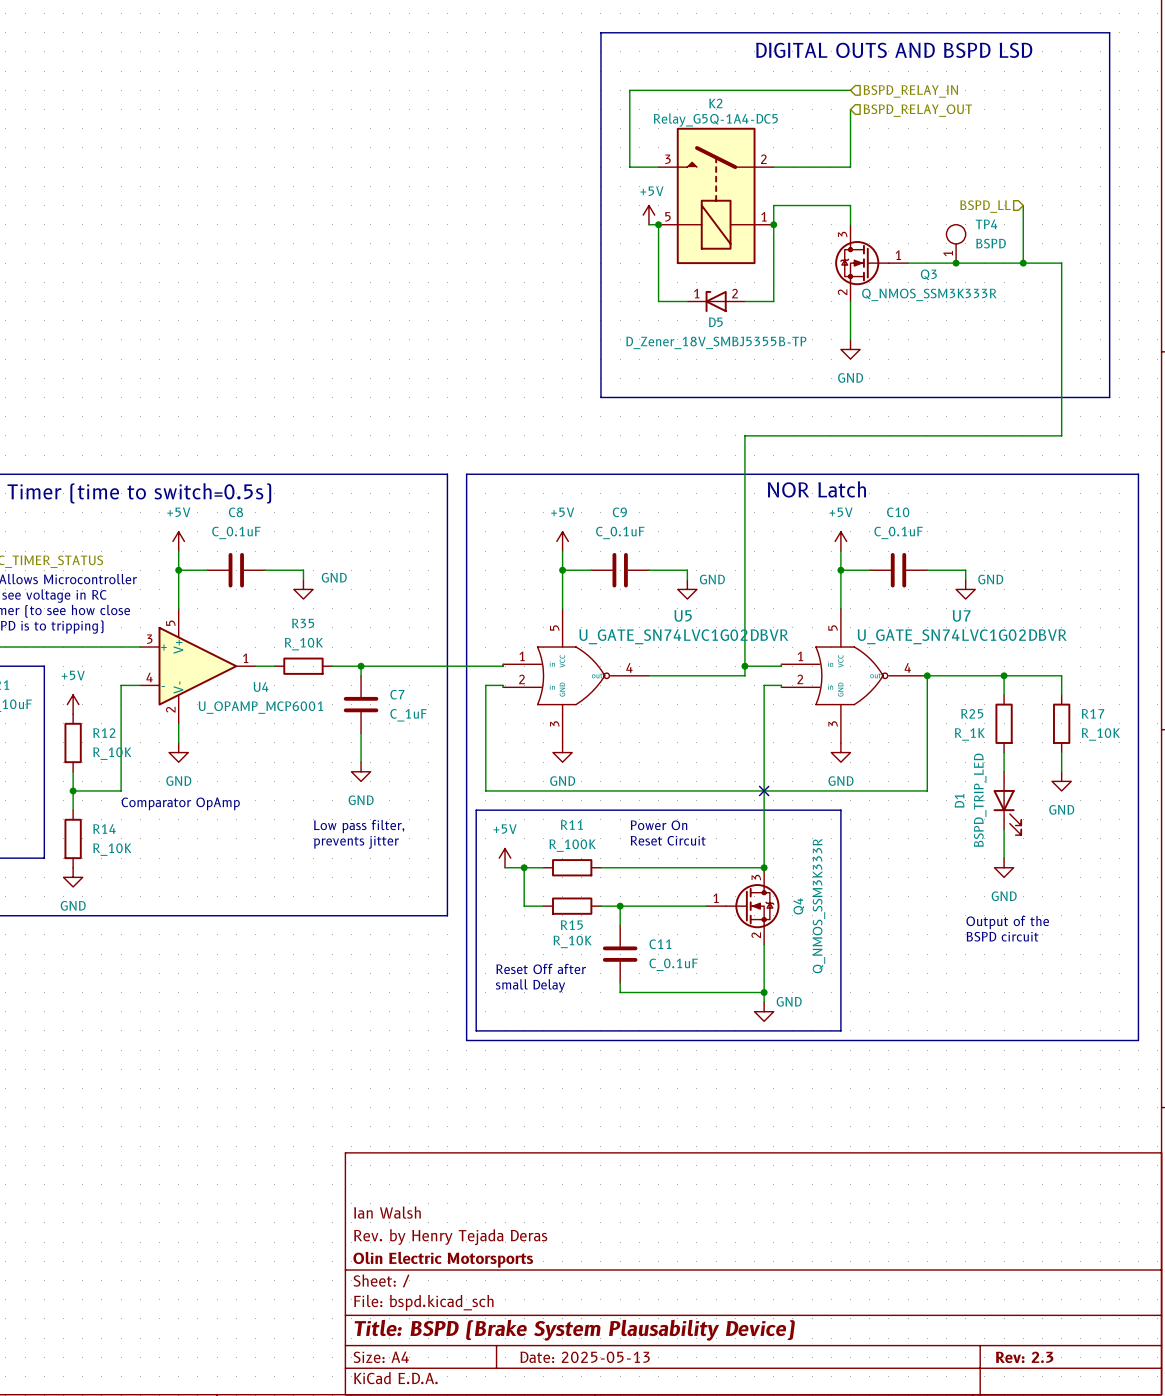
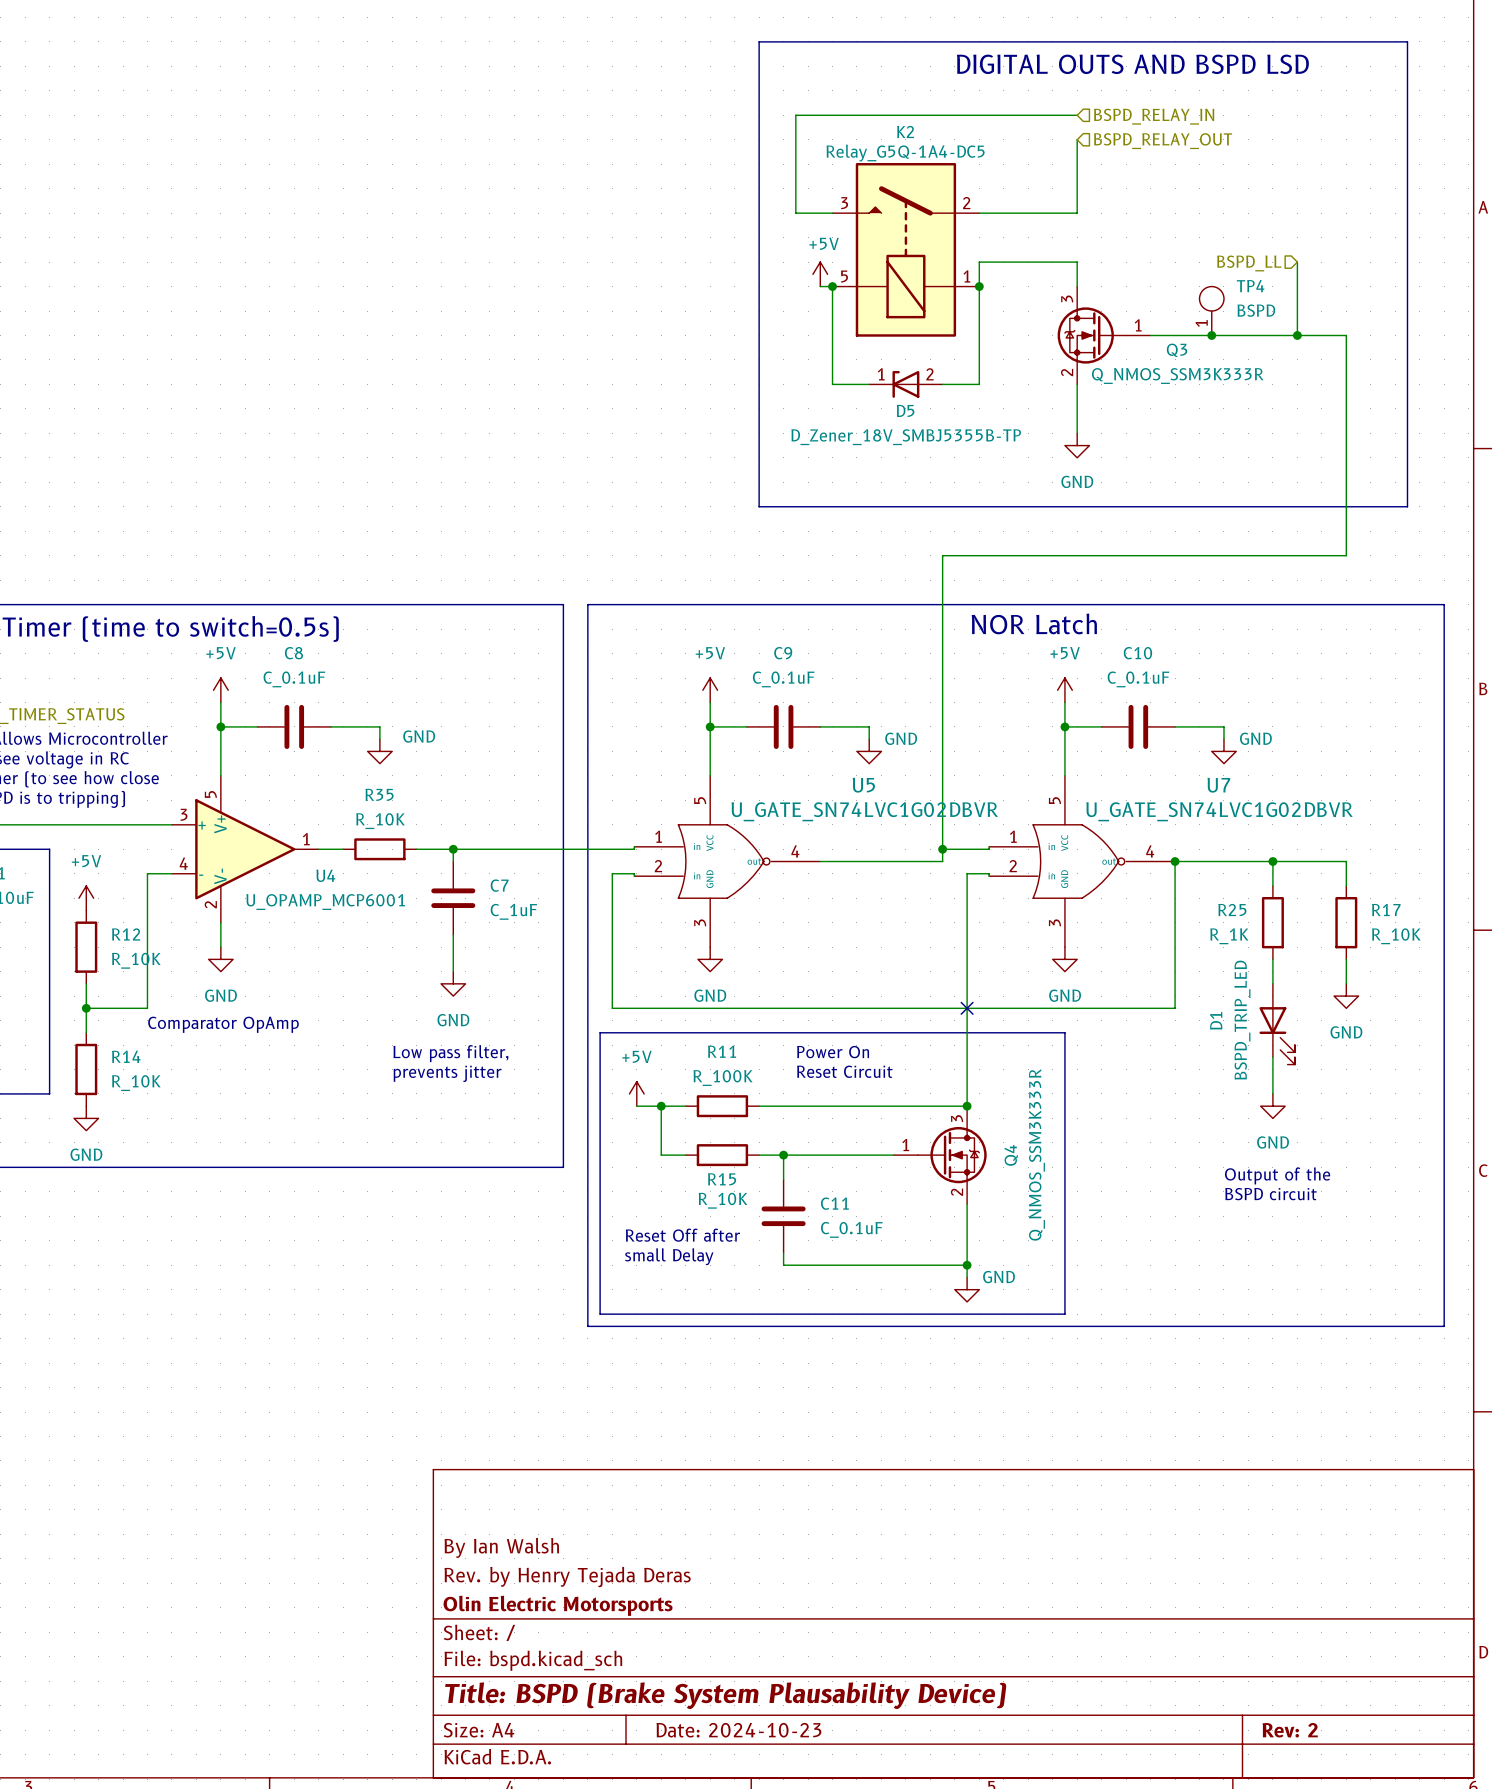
title block: Ian Walsh (387, 1212) -> By Ian Walsh (501, 1547)
title block: Date: 2025-05-13 (585, 1357) -> Date: 2024-10-23 (738, 1730)
title block: Rev: 2.3 (1024, 1357) -> Rev: 2 (1290, 1730)

